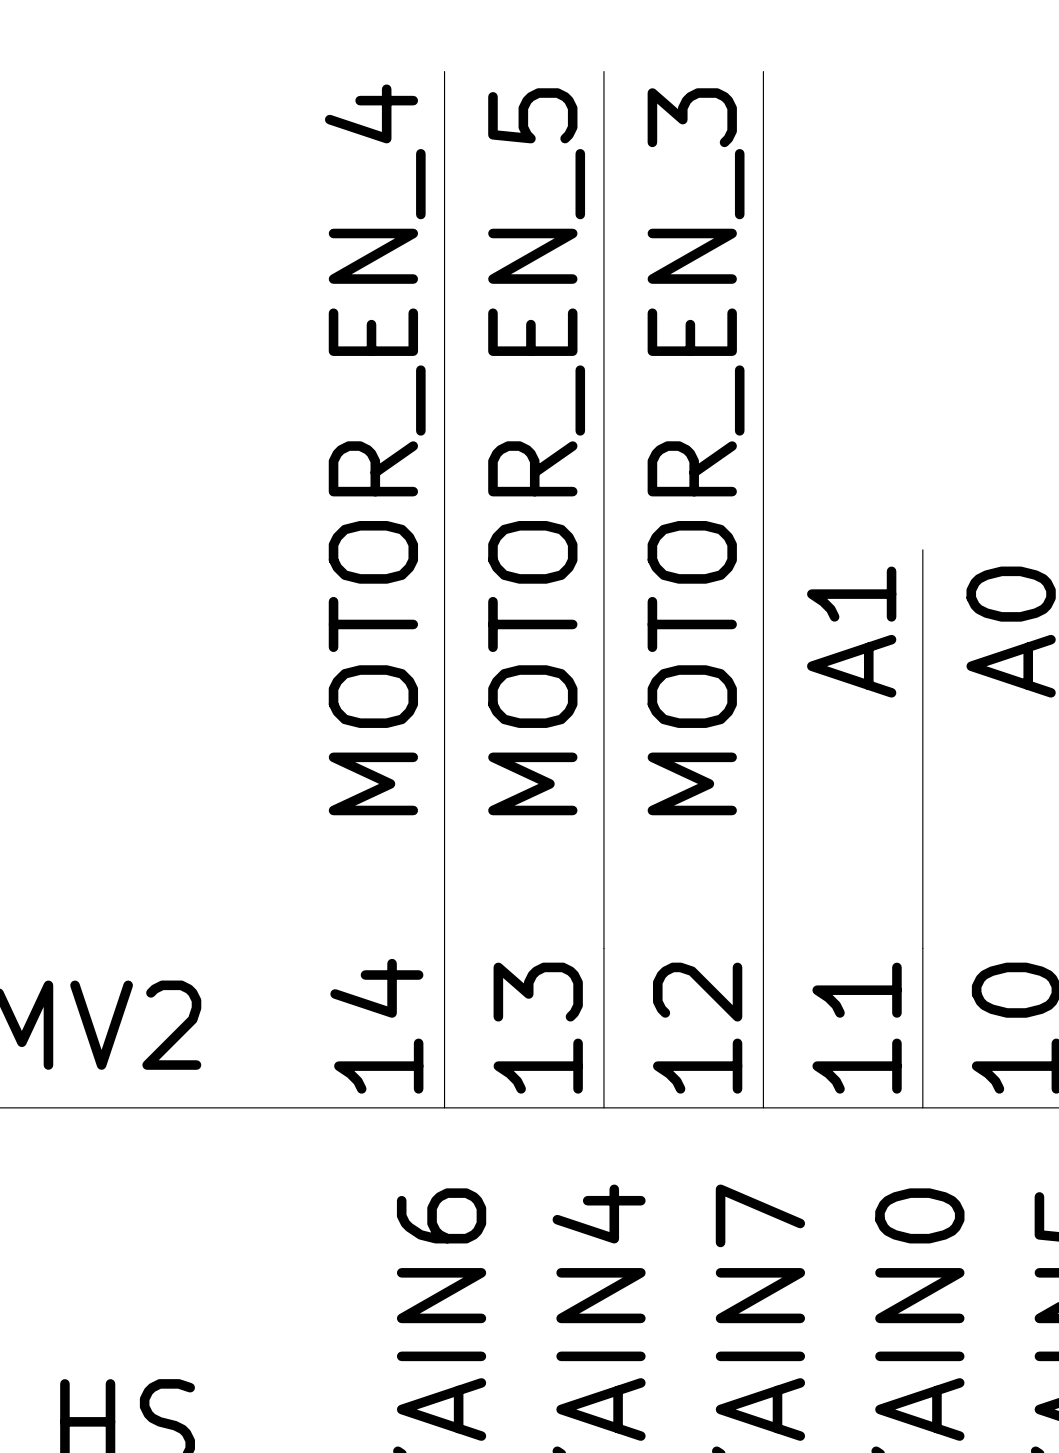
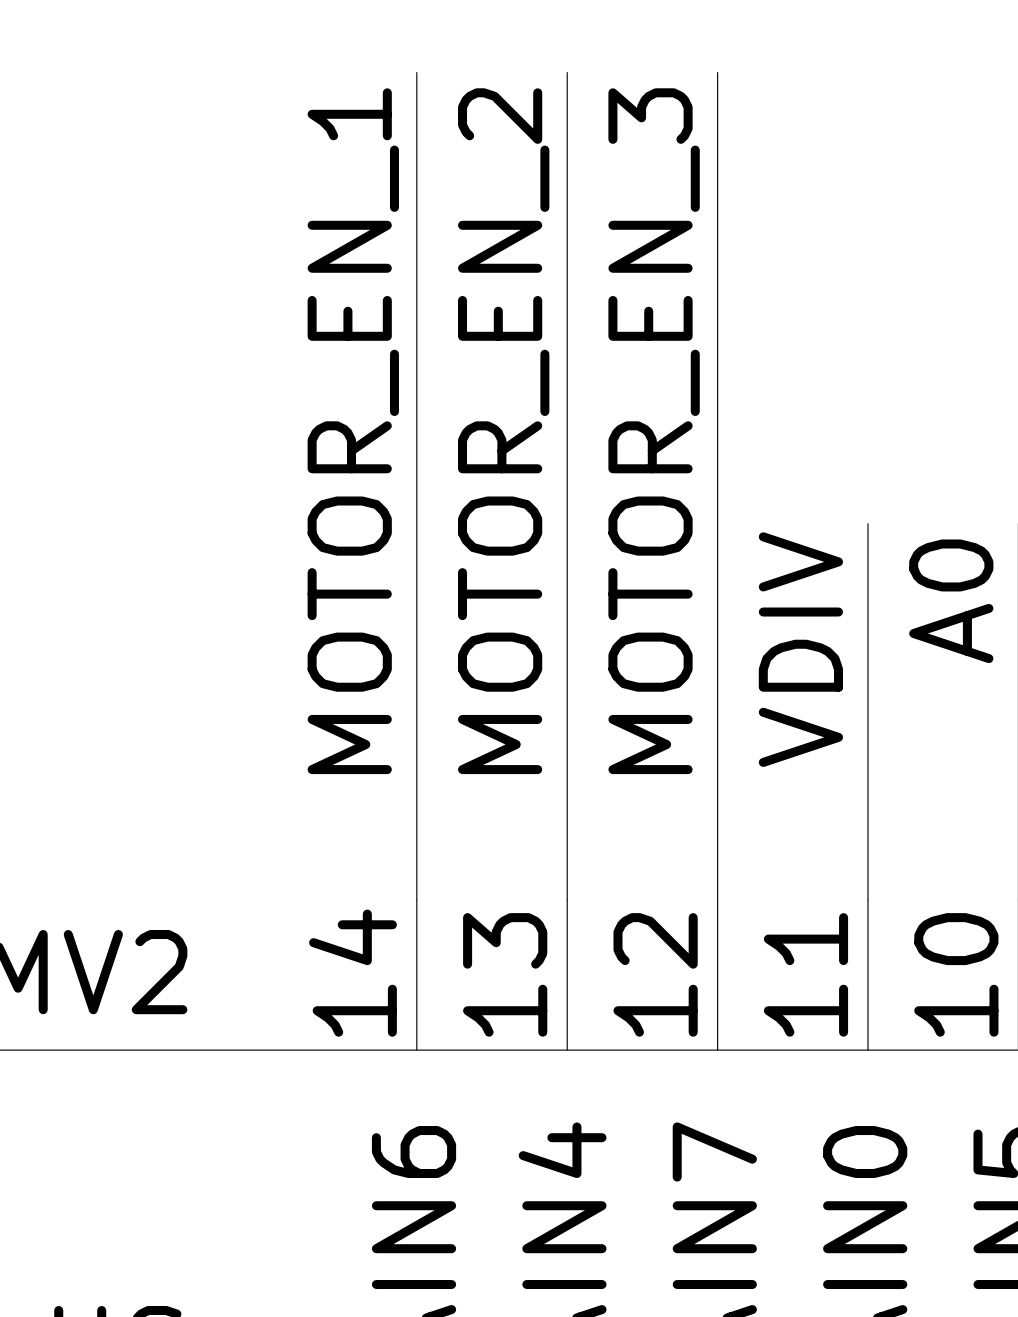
label: MOTOR_EN_4 (375, 449) -> MOTOR_EN_1 (353, 431)
label: MOTOR_EN_5 (536, 451) -> MOTOR_EN_2 (503, 431)
label: A1 (851, 632) -> VDIV (800, 649)

